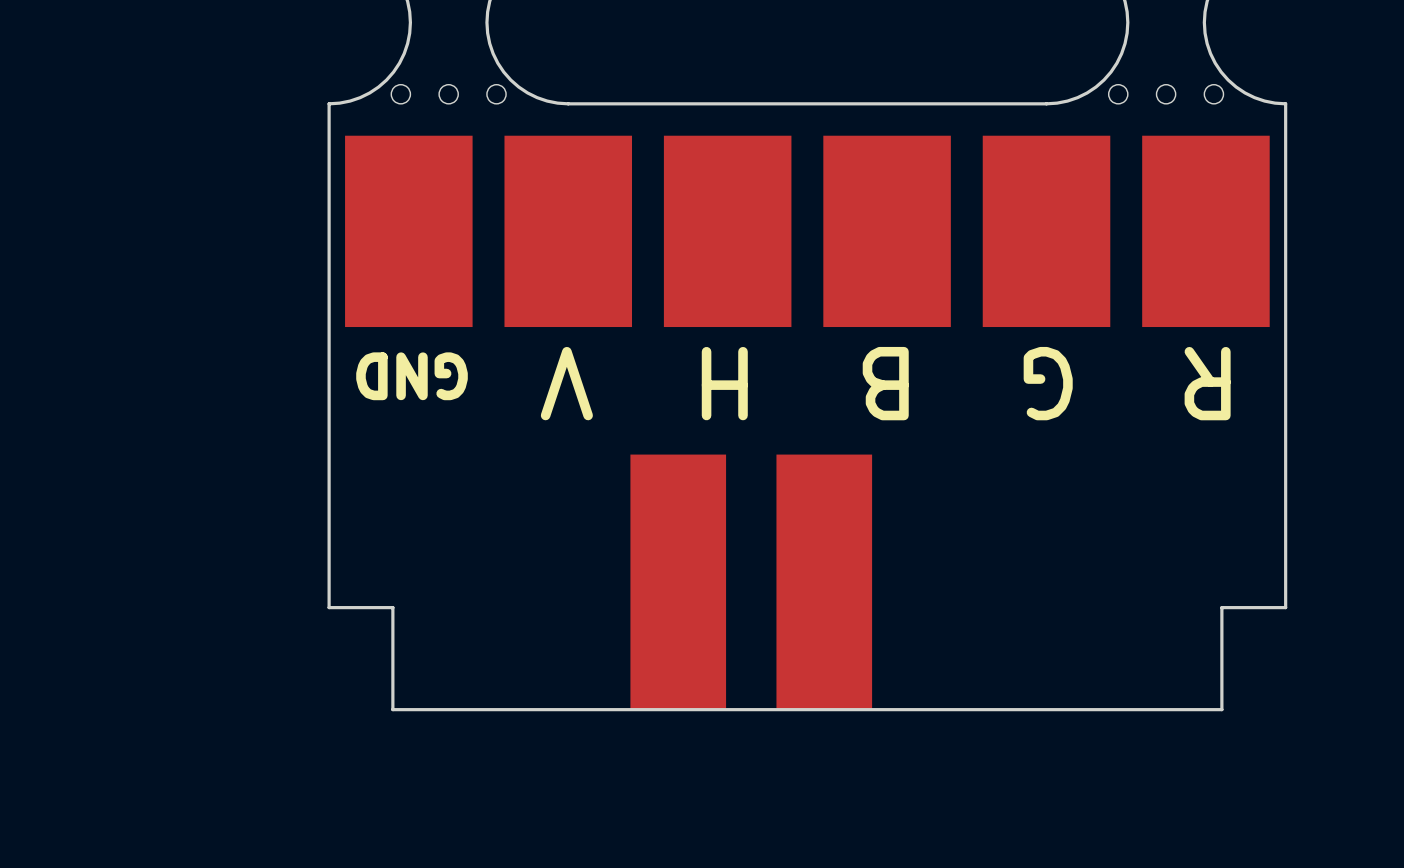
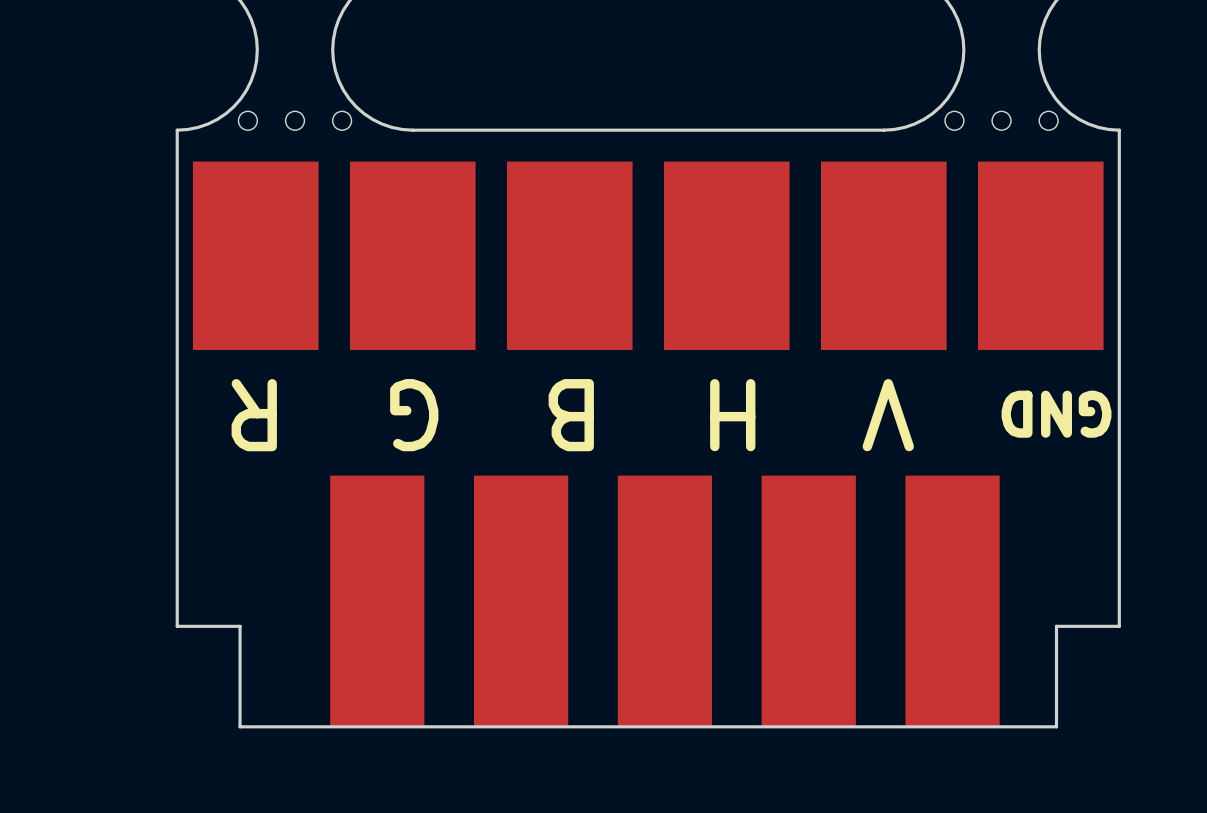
text position: GND (412, 376) -> GND (1056, 414)
text: R G B H V (885, 383) -> none
text: none -> V H B G R (572, 415)
part: none -> (377, 601)
part: none -> (808, 601)
part: none -> (952, 601)

